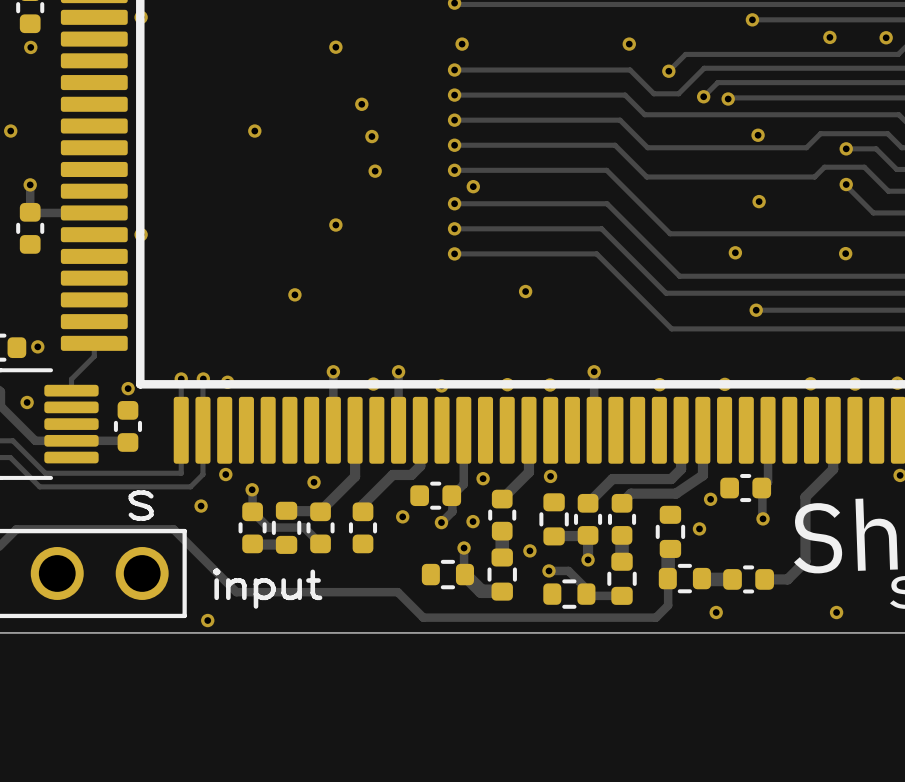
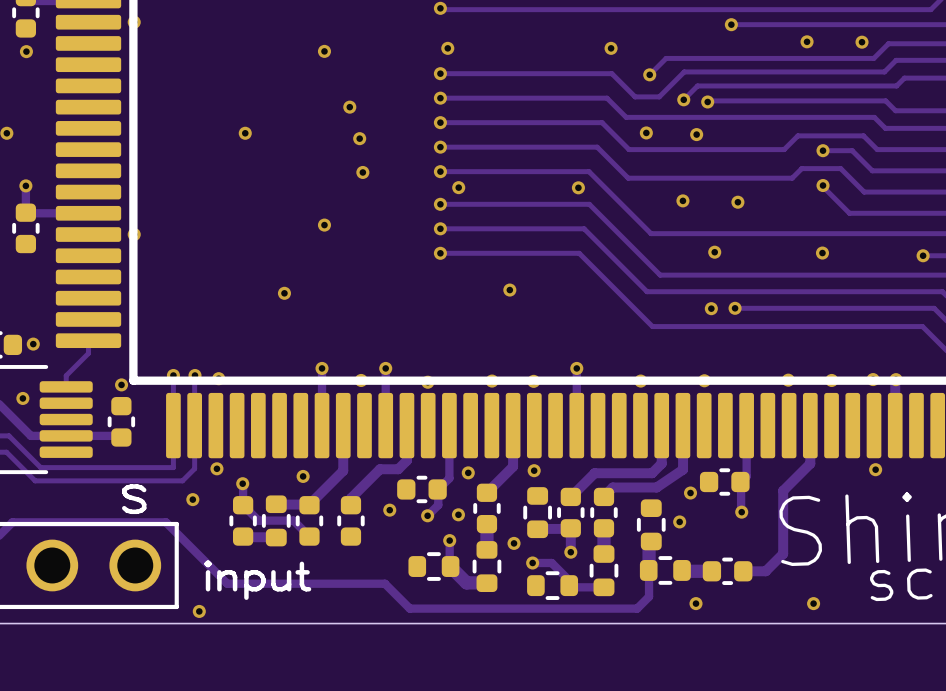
via: none -> (646, 132)
via position: (758, 135) -> (696, 134)
via: none -> (578, 187)
via: none -> (682, 200)
via: none -> (711, 308)

